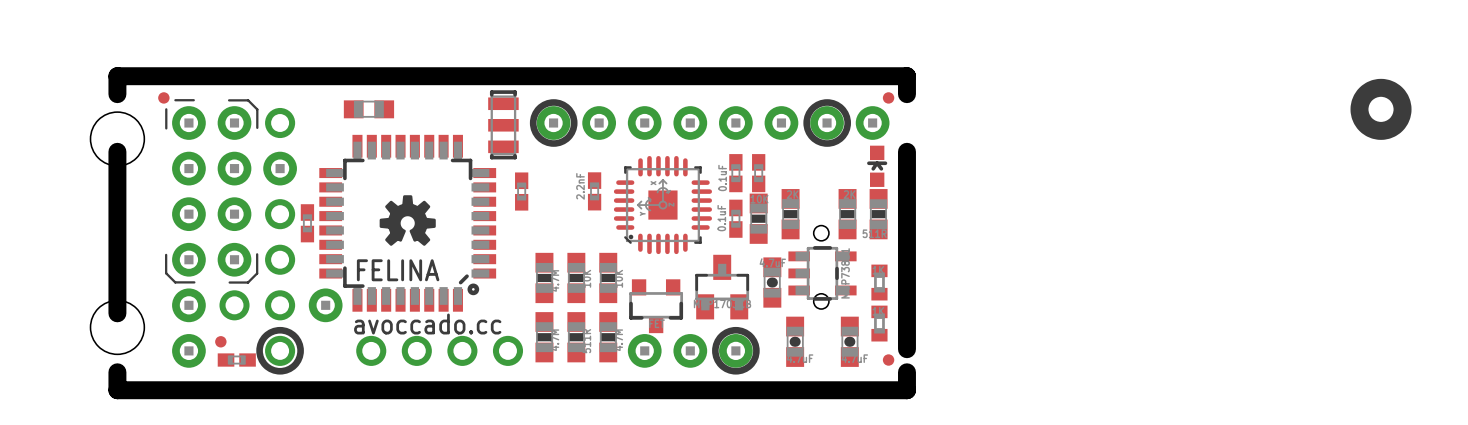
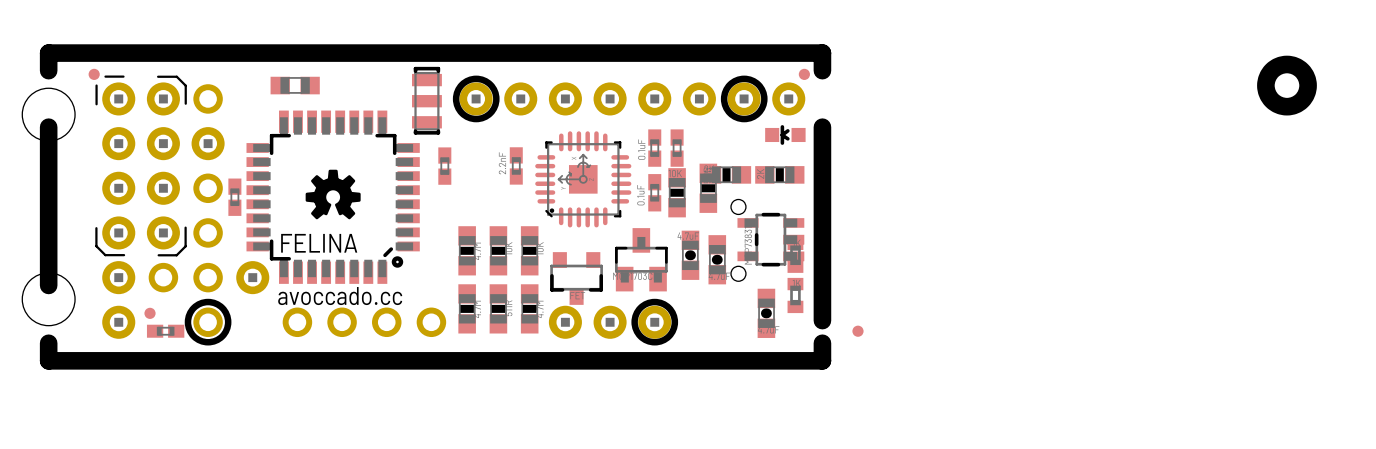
part rotation: 0° (877, 166) -> 90° counterclockwise (785, 134)
part rotation: 0° (847, 214) -> 90° clockwise (779, 174)
part rotation: 0° (878, 214) -> 90° clockwise (726, 174)
part position: (878, 214) -> (726, 174)
part rotation: 0° (822, 273) -> 180° (770, 239)
part position: (795, 341) -> (717, 259)
part position: (888, 360) -> (857, 331)

